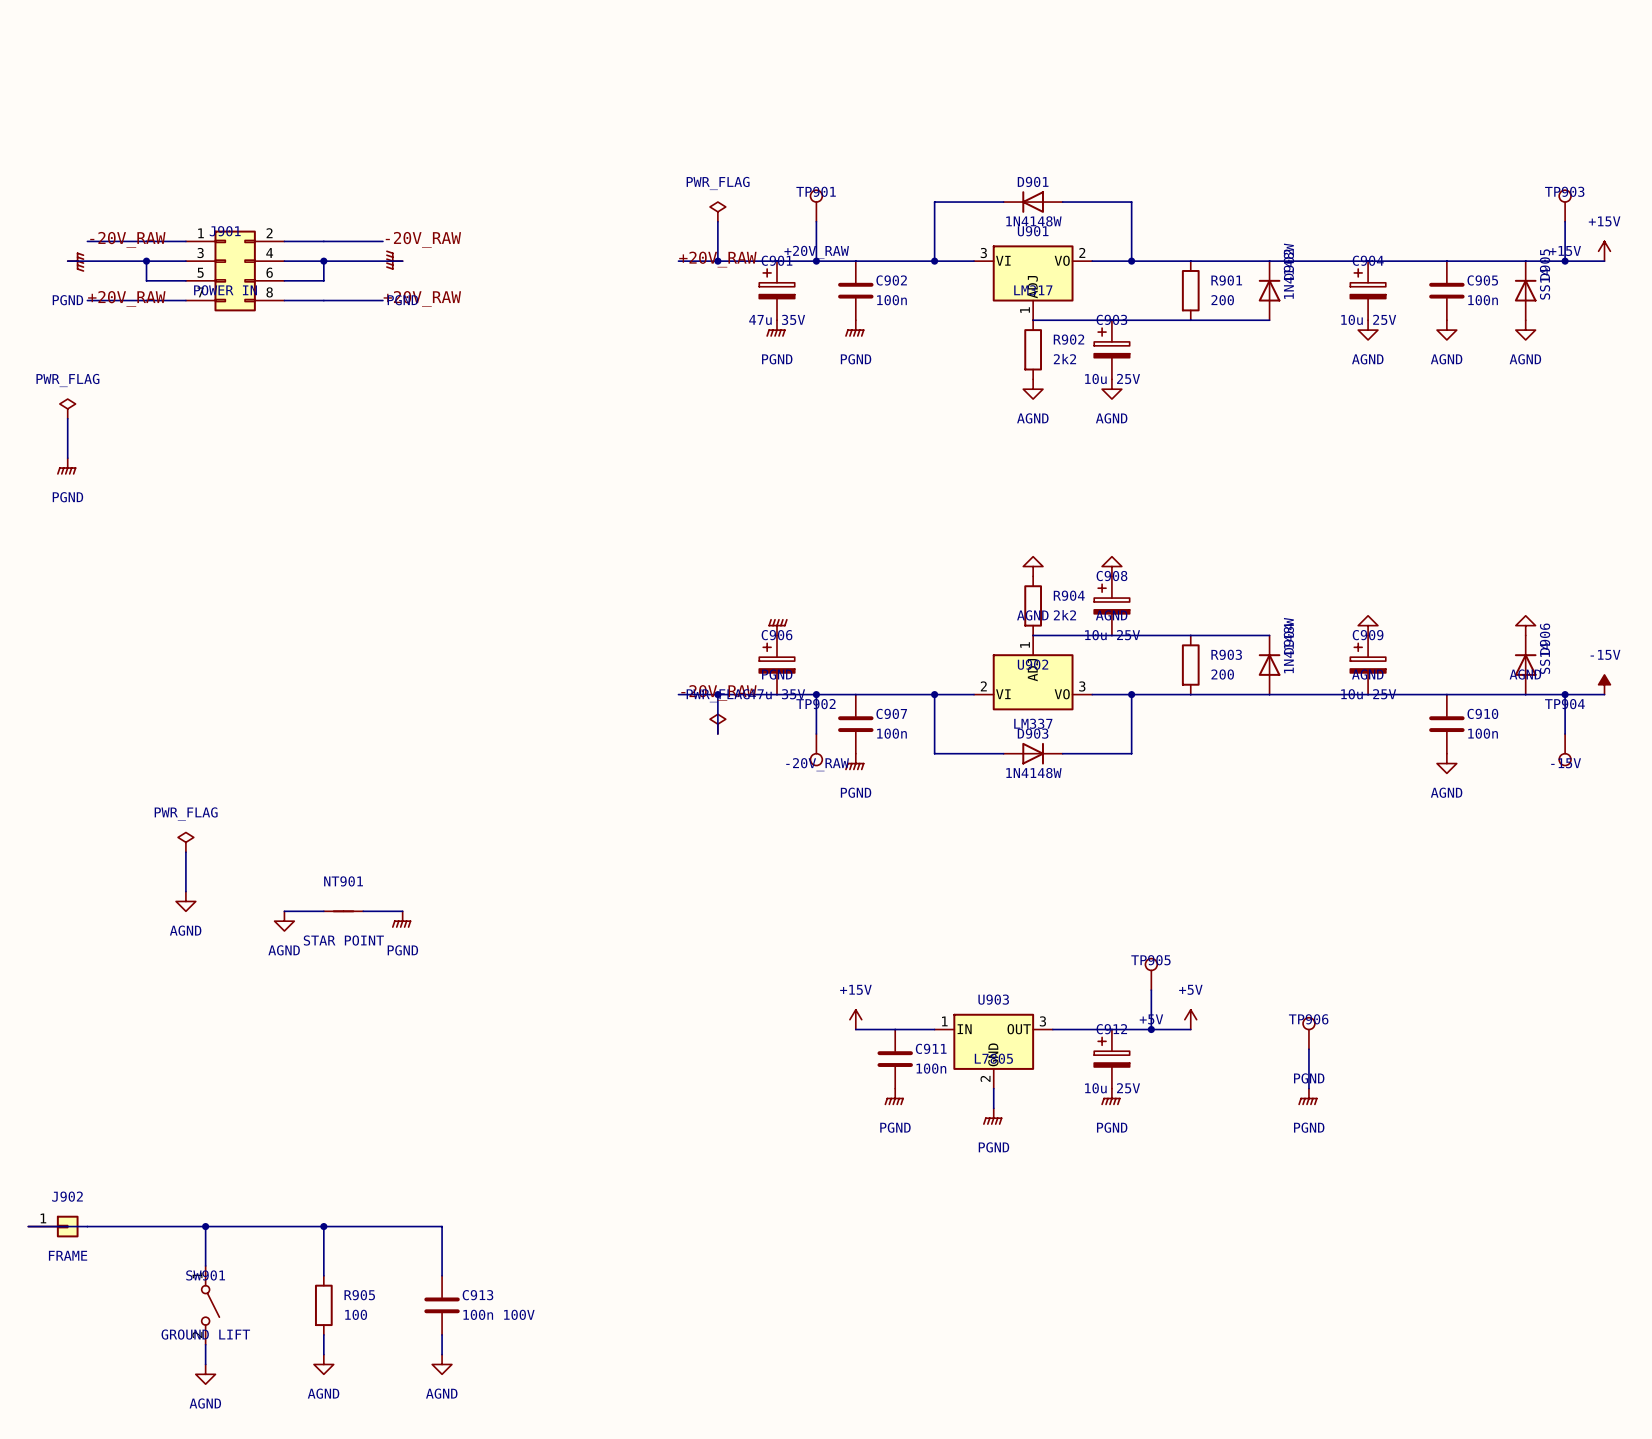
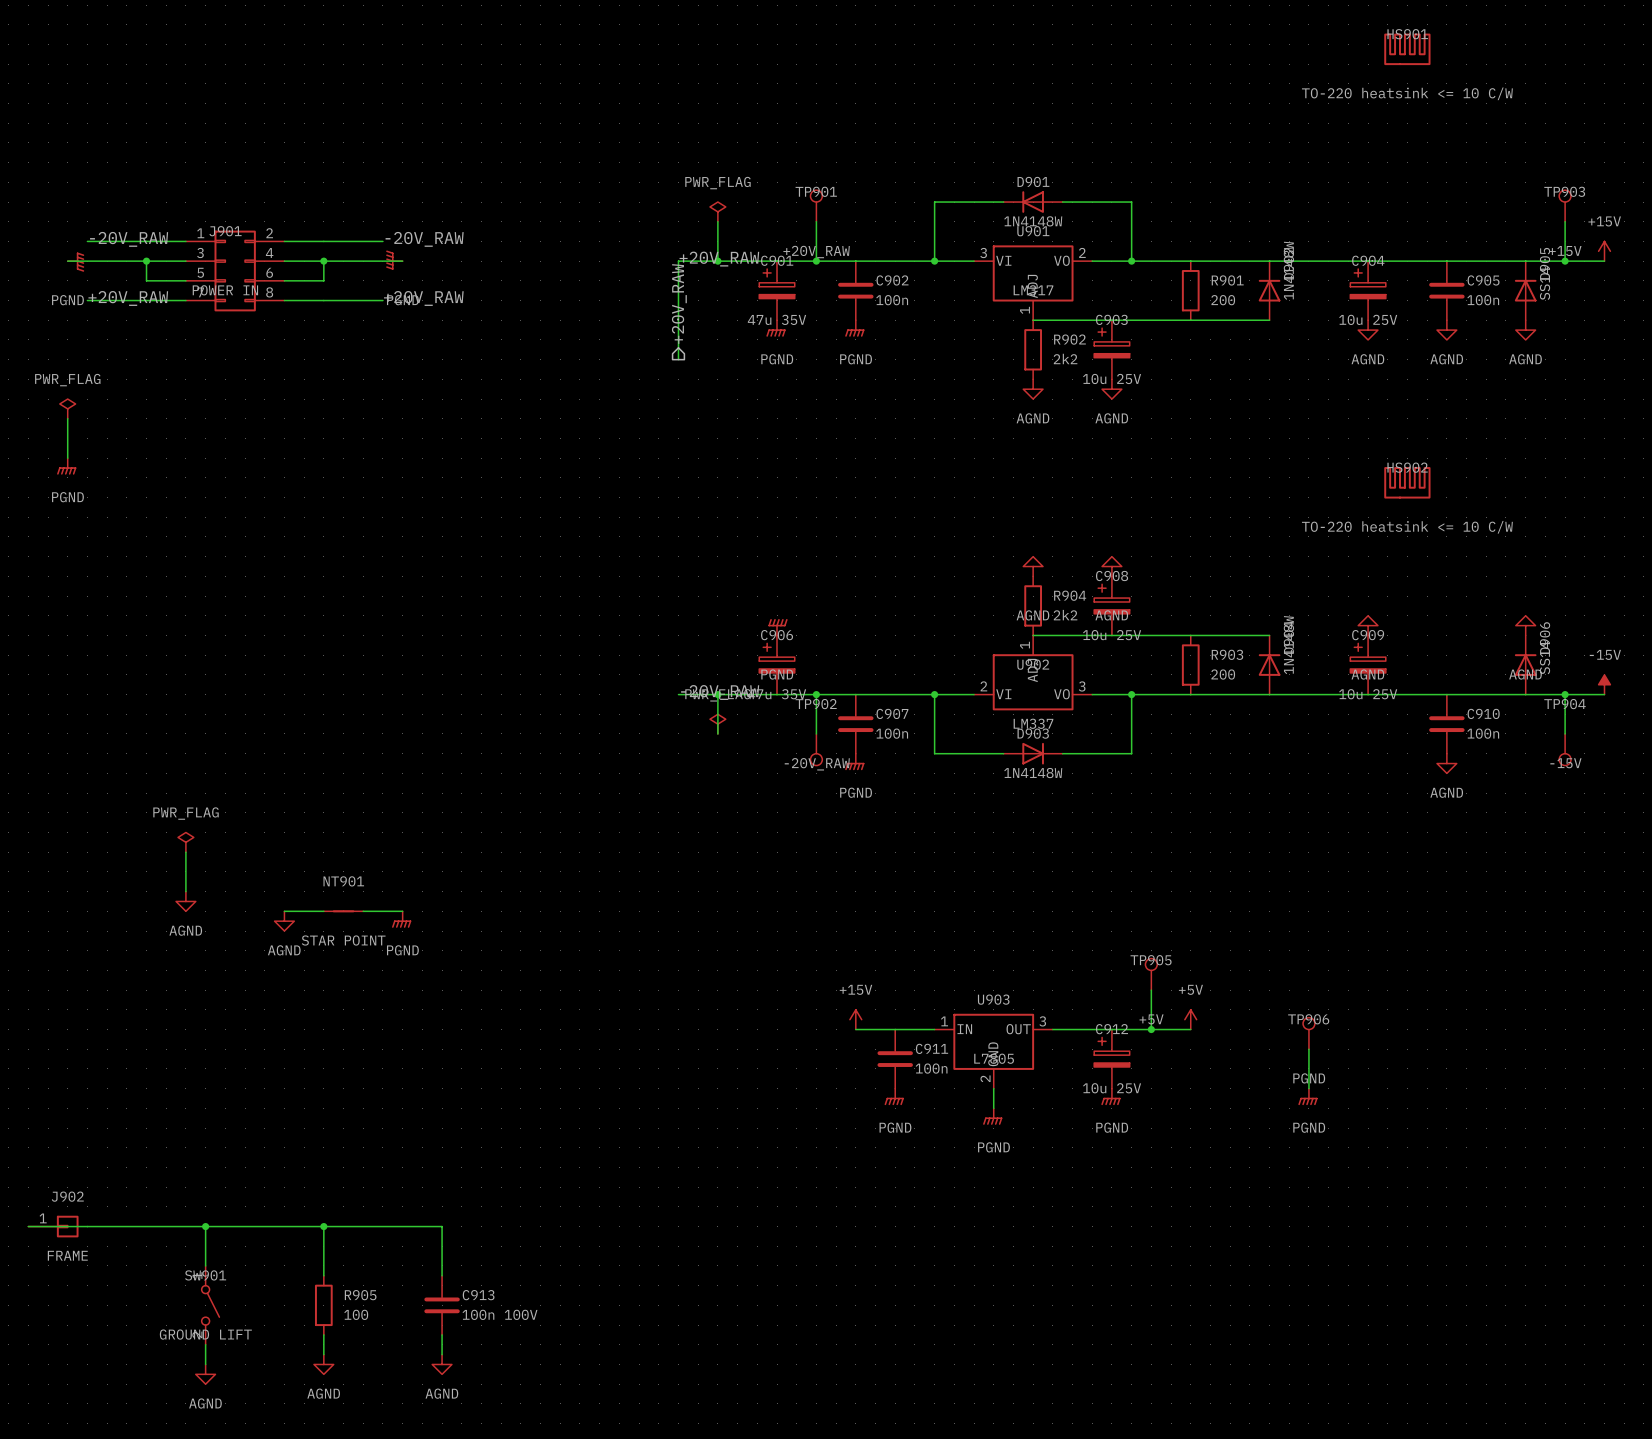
HS901: none -> TO-220 heatsink <= 10 C/W (1407, 49)
wire: none -> (678, 261) (678, 359)
hierarchical label: none -> +20V_RAW (679, 303)
HS902: none -> TO-220 heatsink <= 10 C/W (1407, 482)

